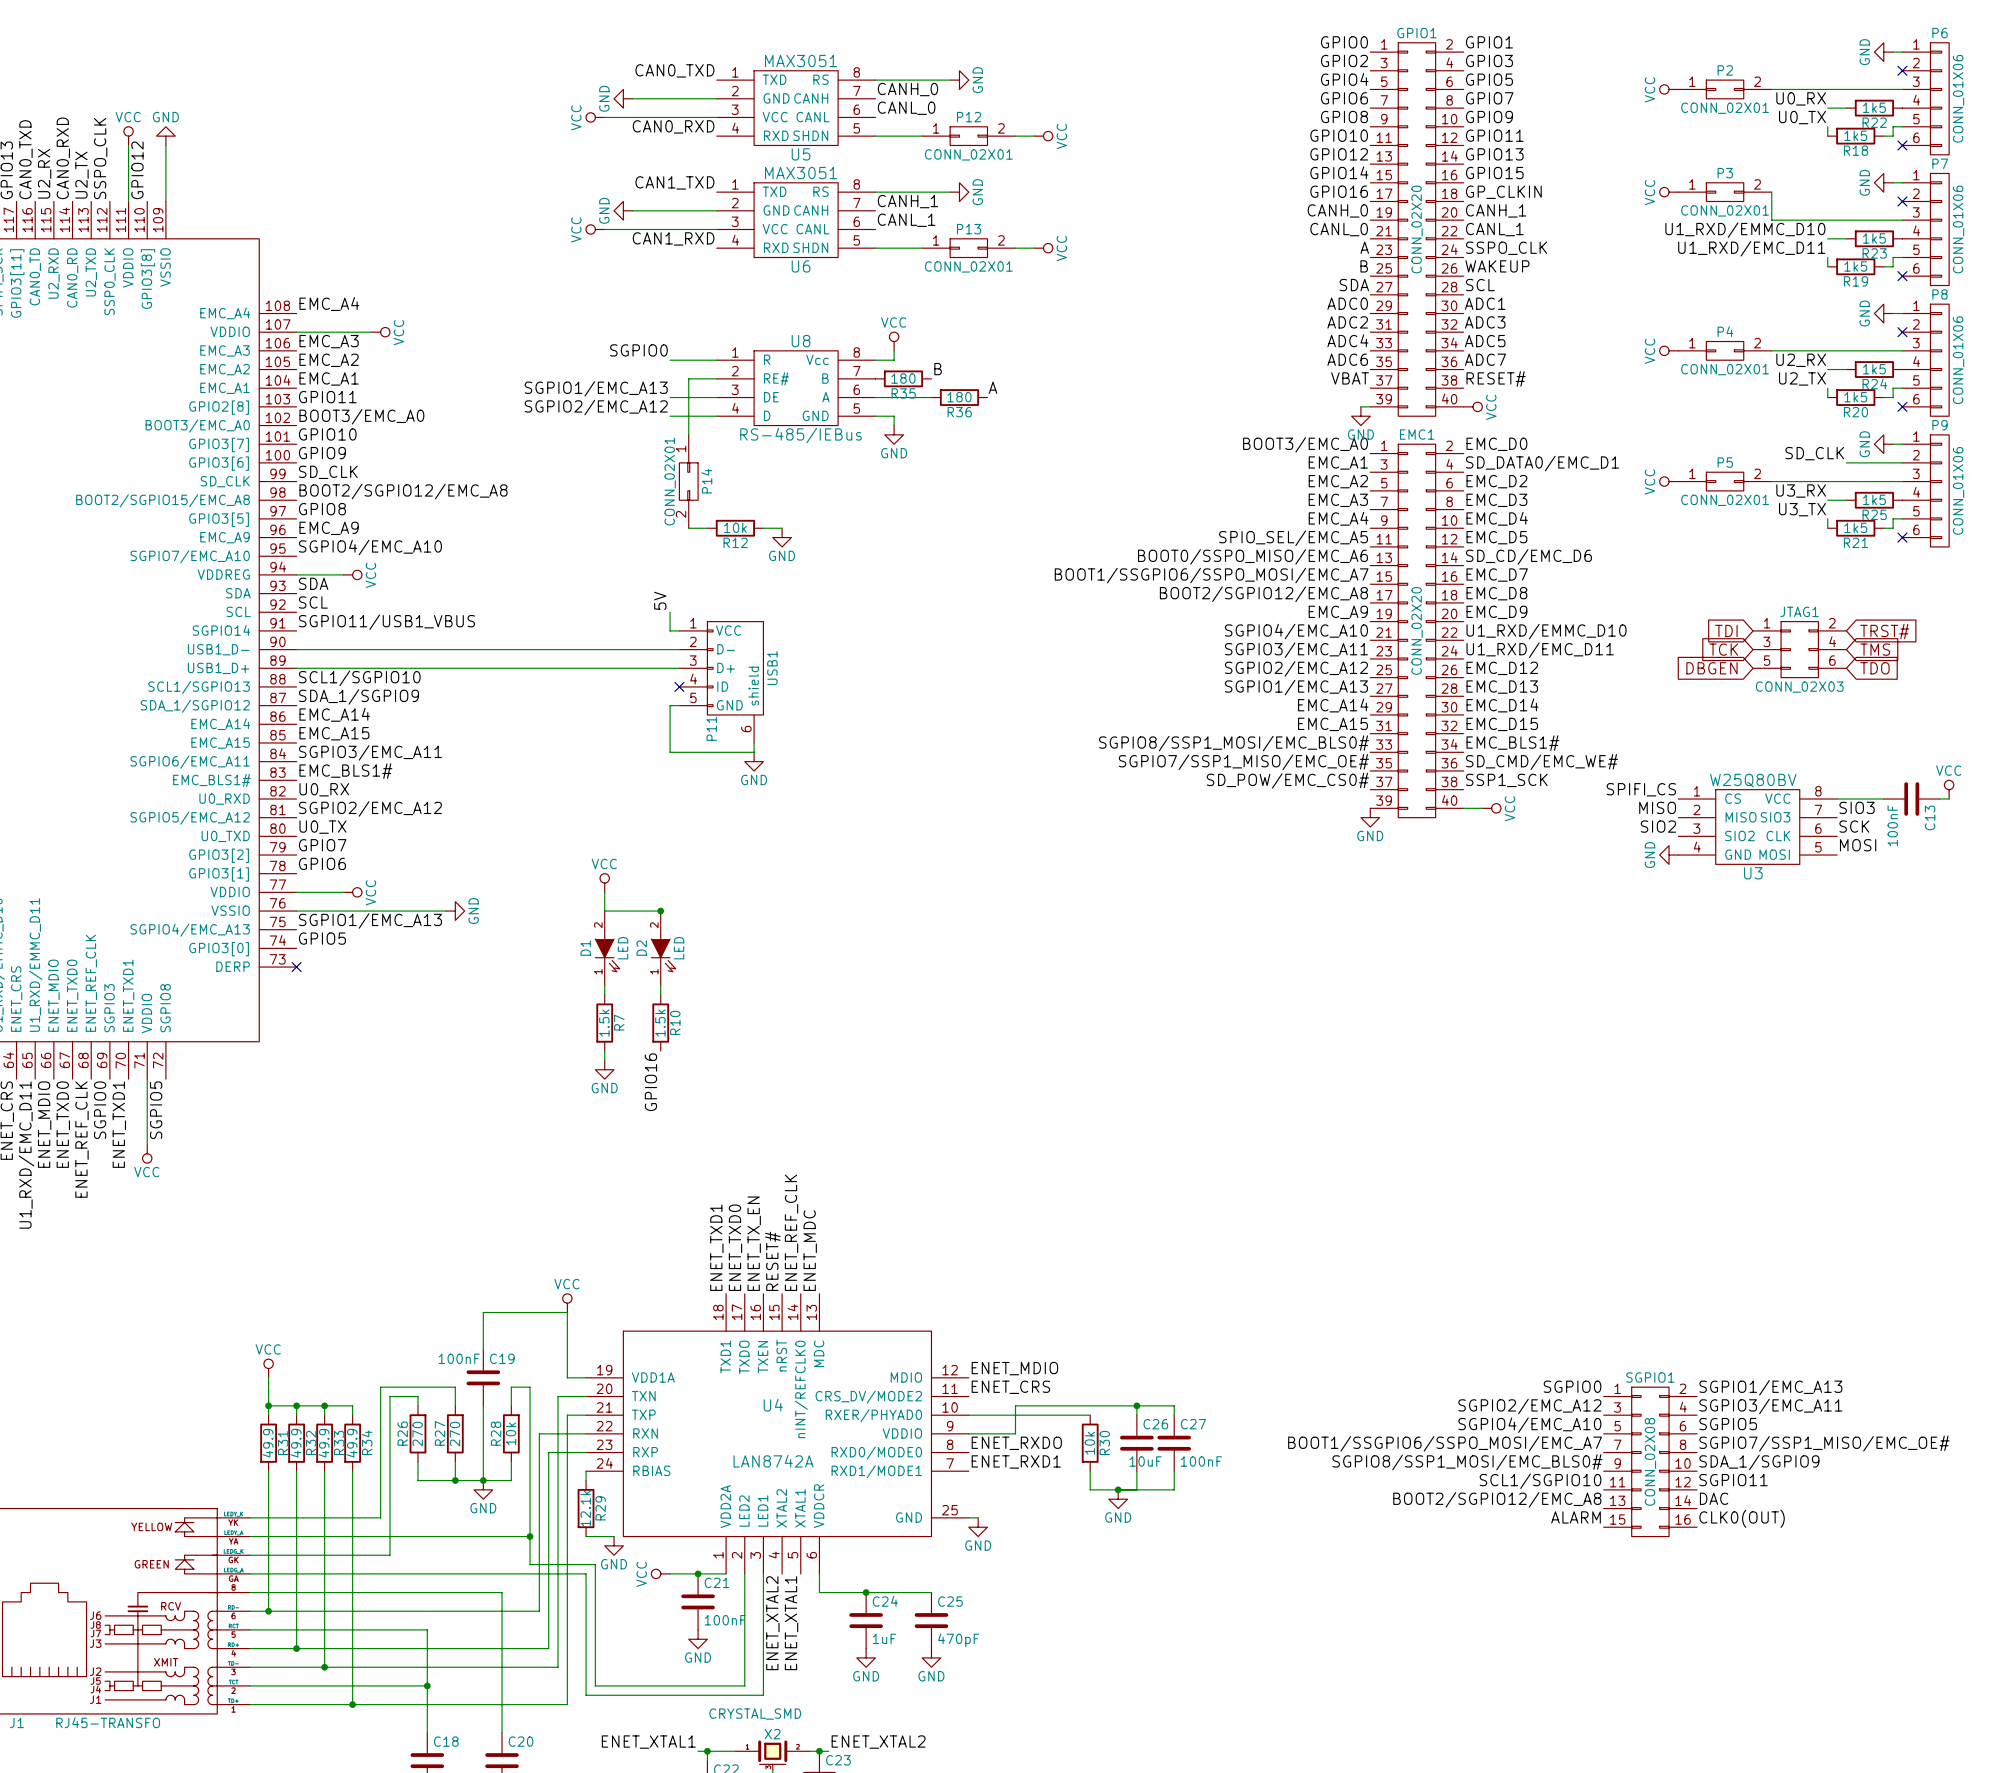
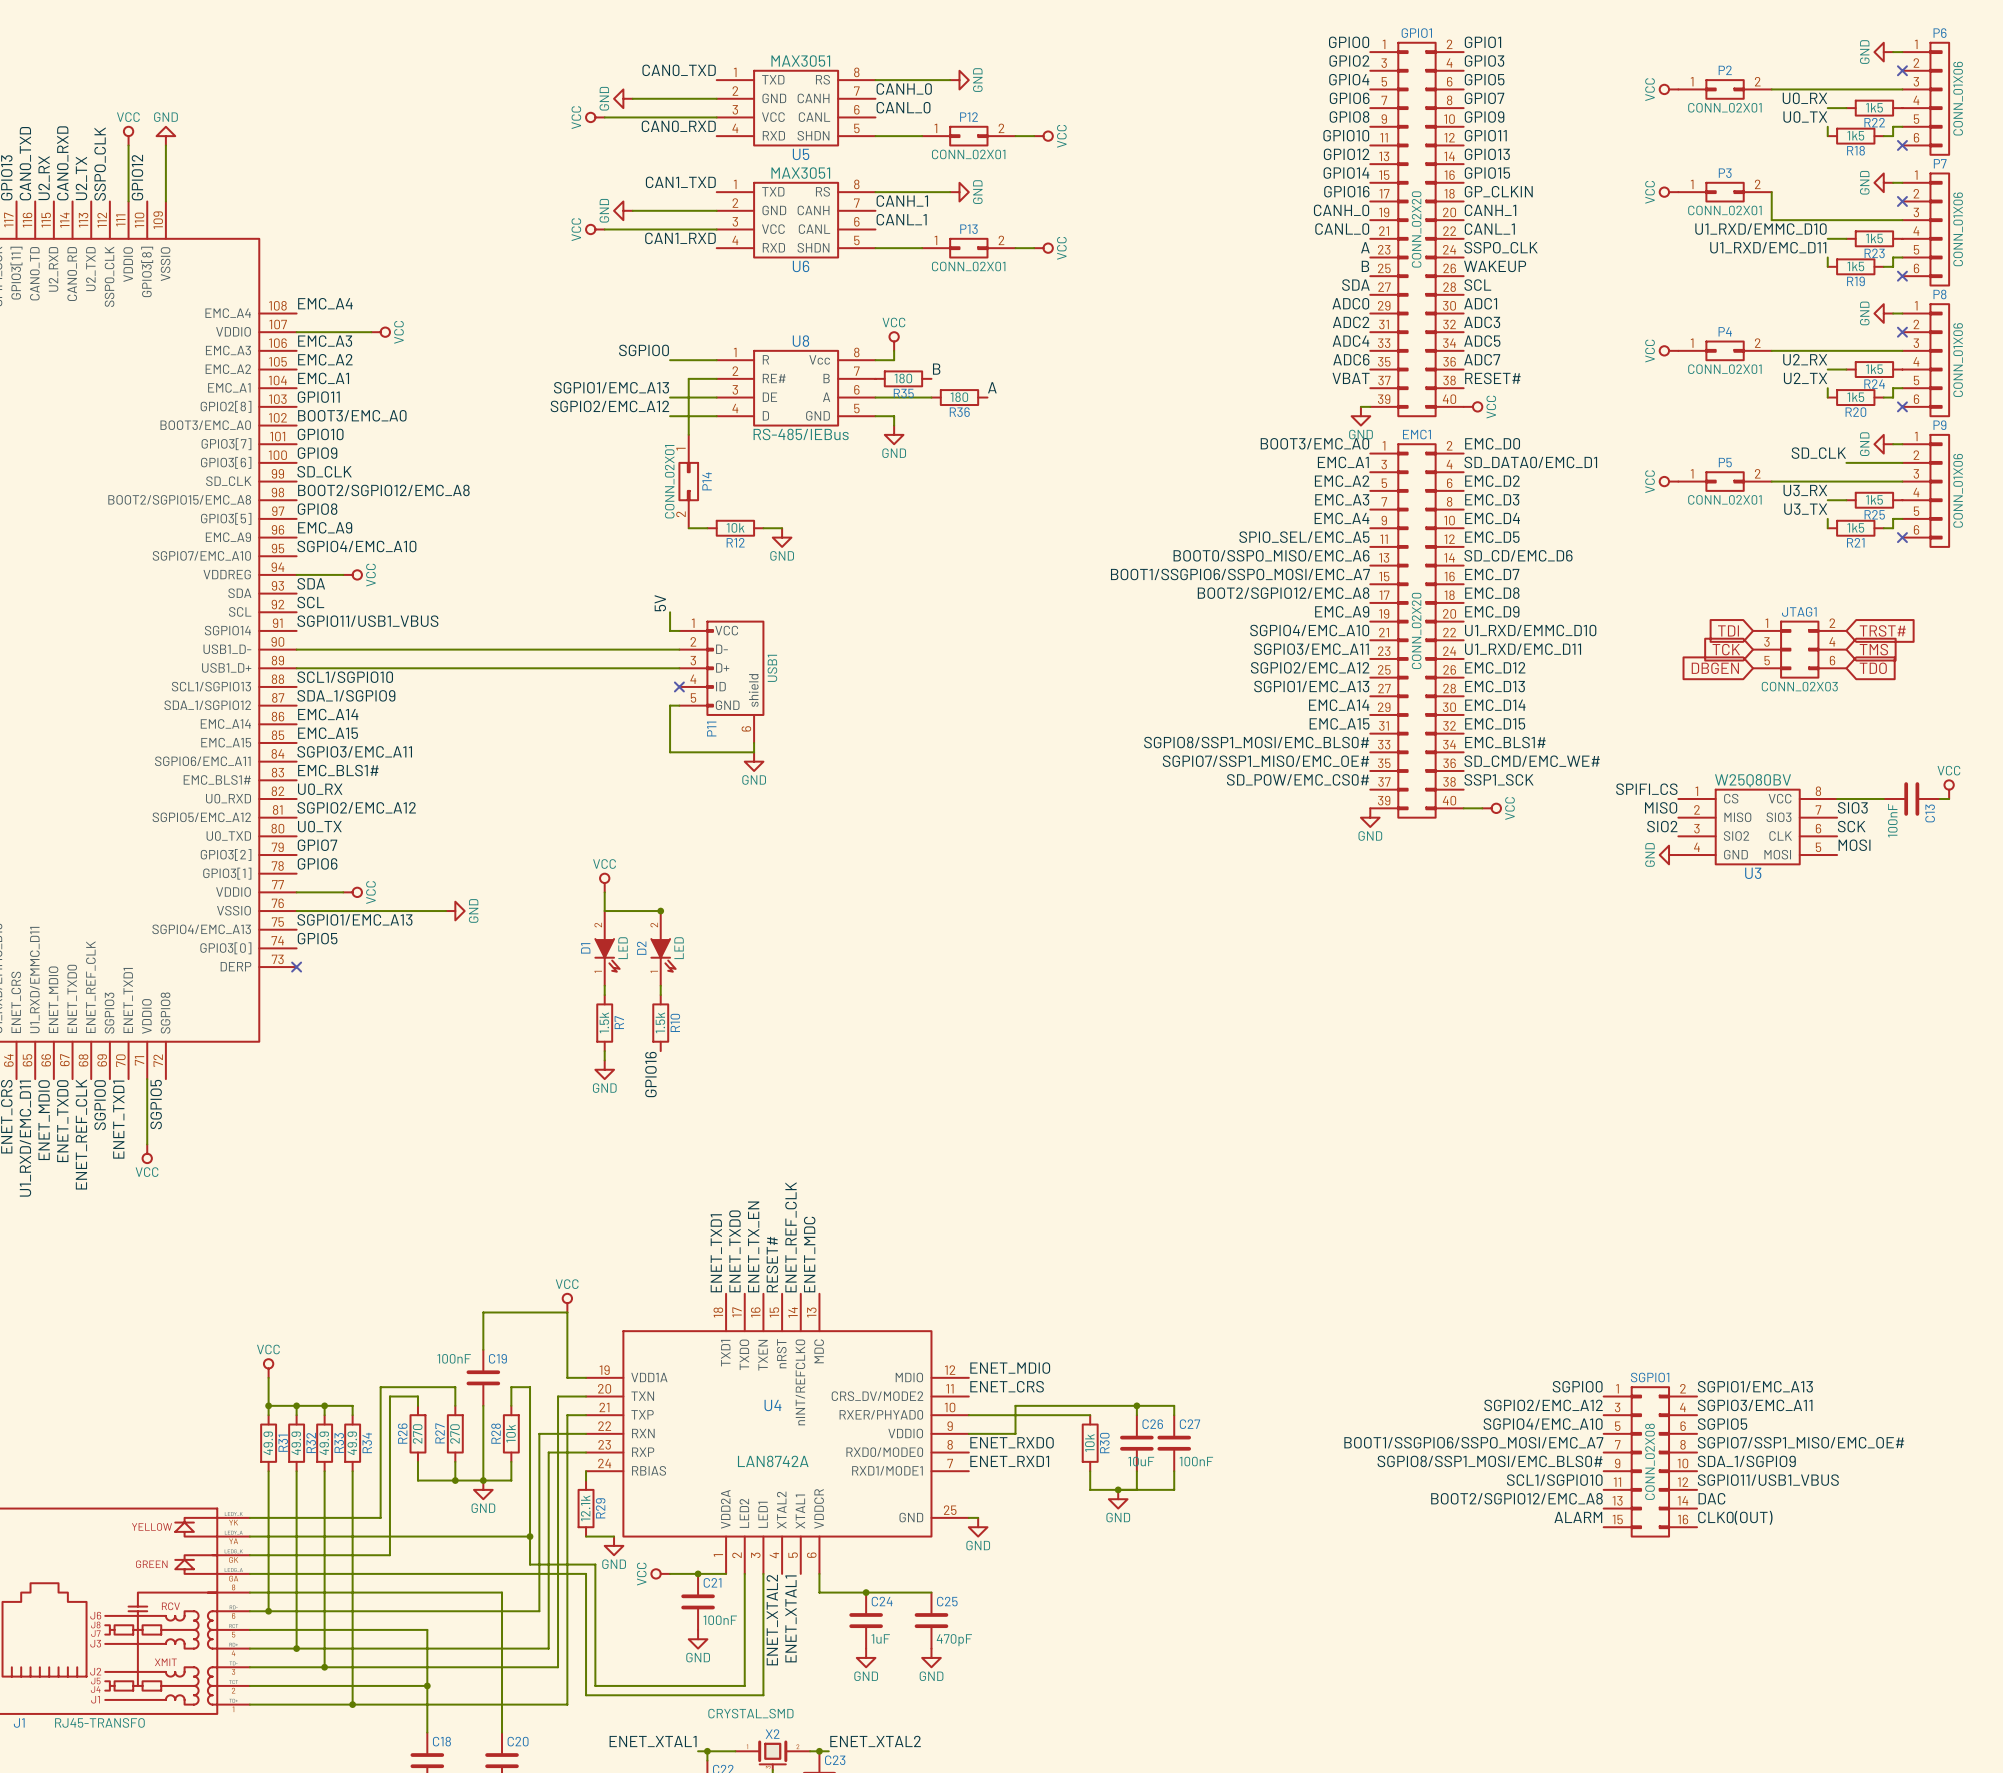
label: SGPIO11 (1733, 1480) -> SGPIO11/USB1_VBUS (1768, 1480)

